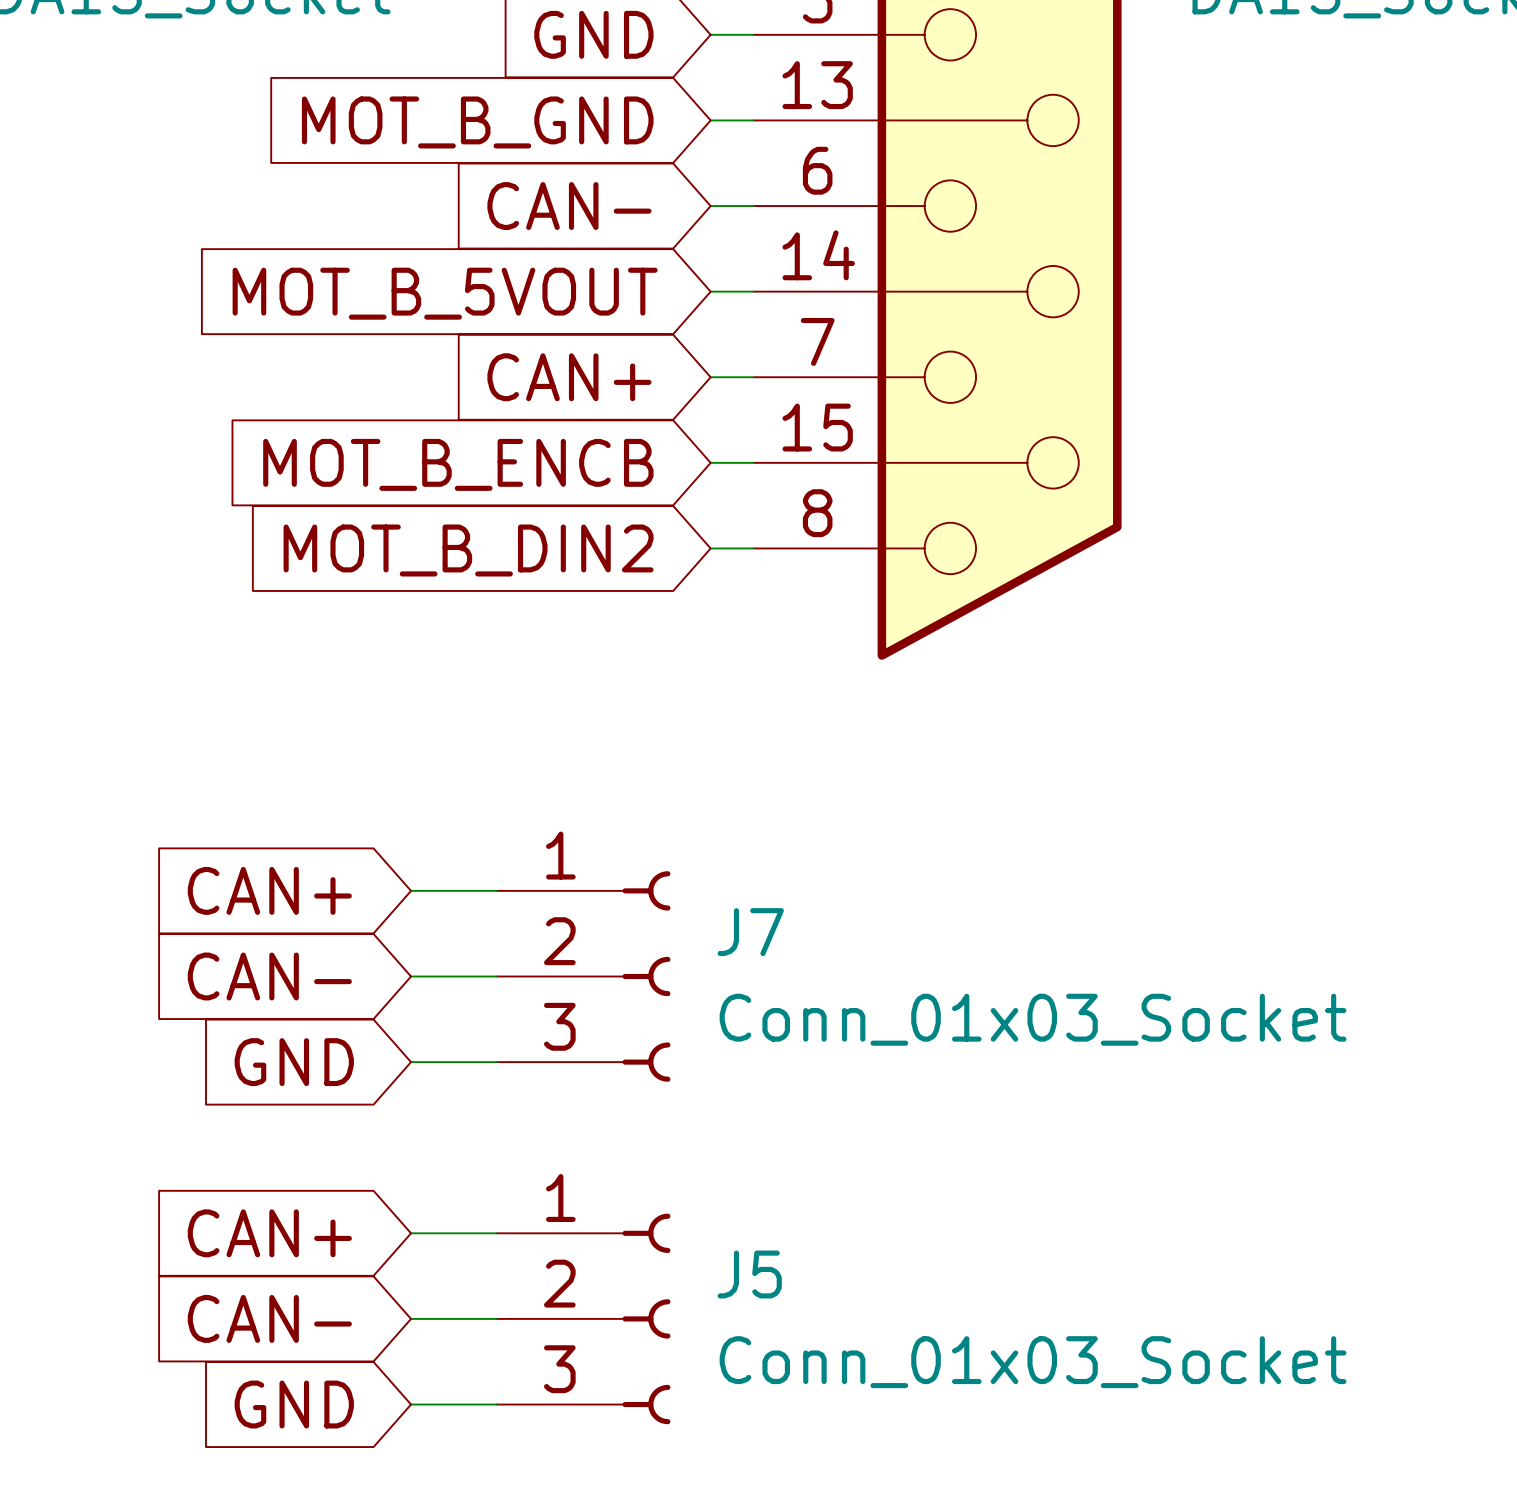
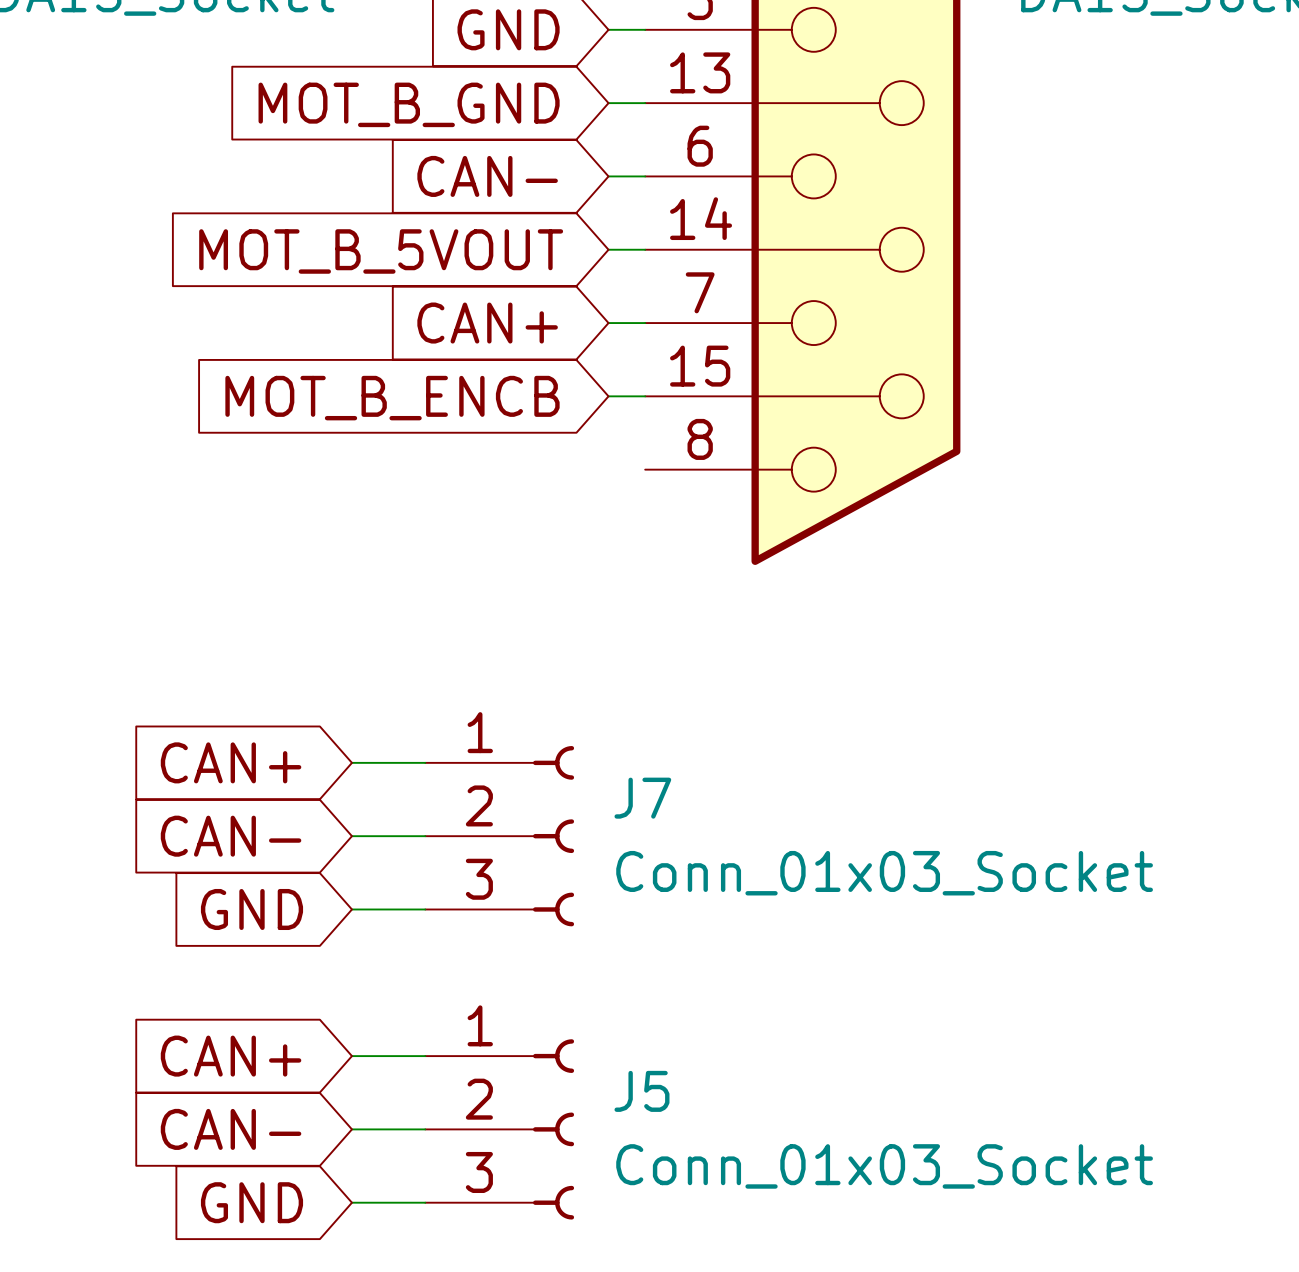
wire: (710, 548) (753, 548) -> none
global label: MOT_B_DIN2 (468, 550) -> none

